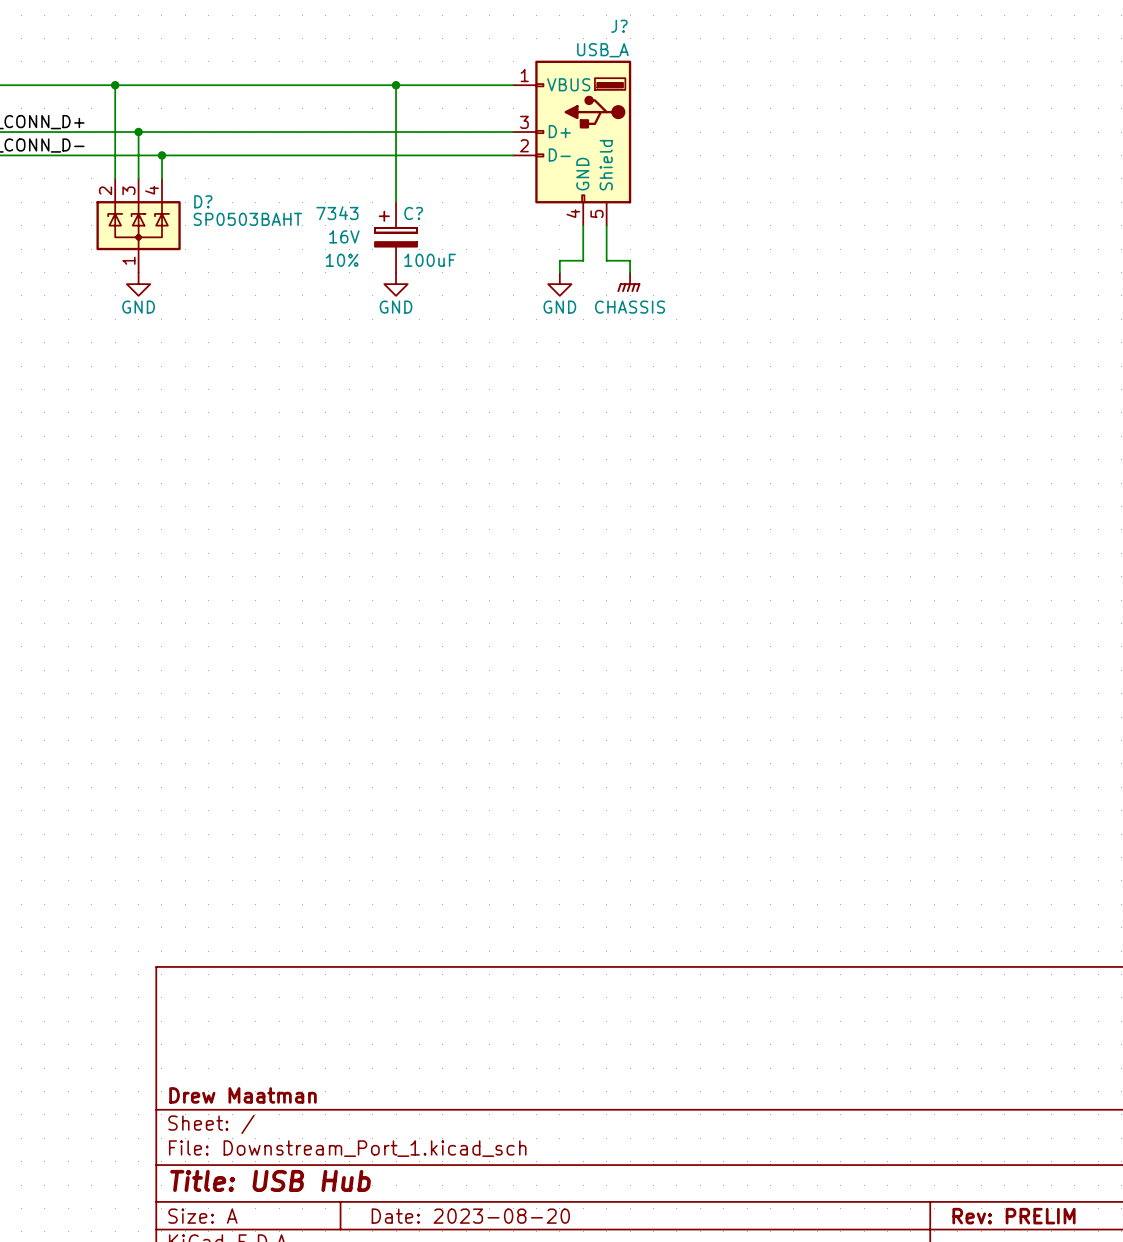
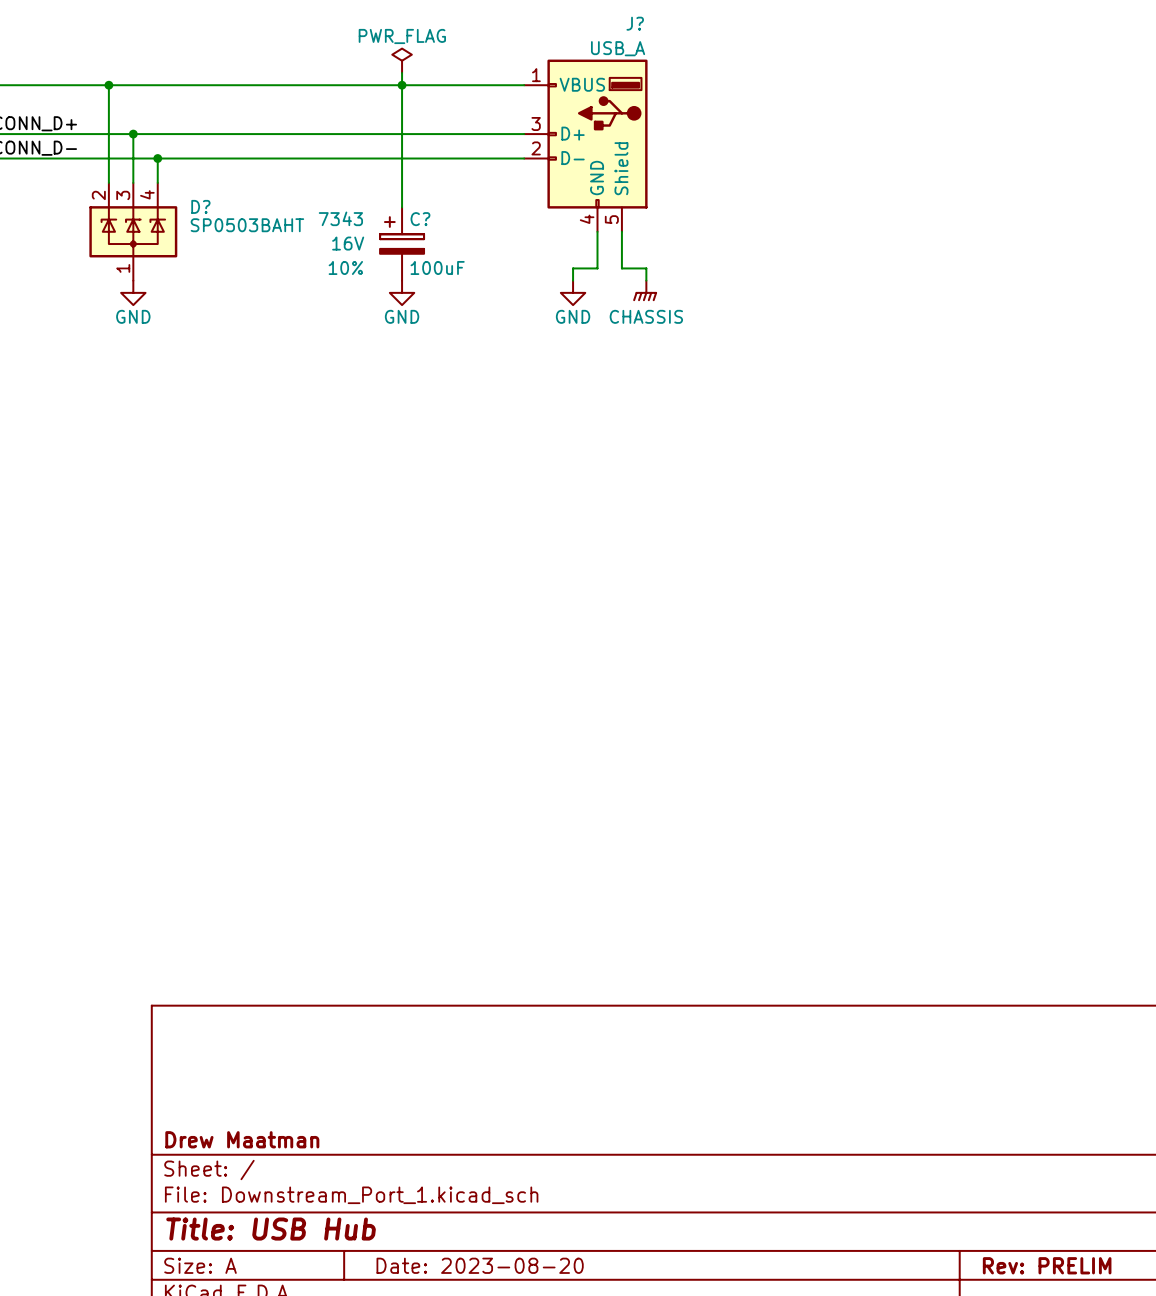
power symbol: none -> PWR_FLAG (402, 60)
wire: none -> (402, 73) (402, 85)

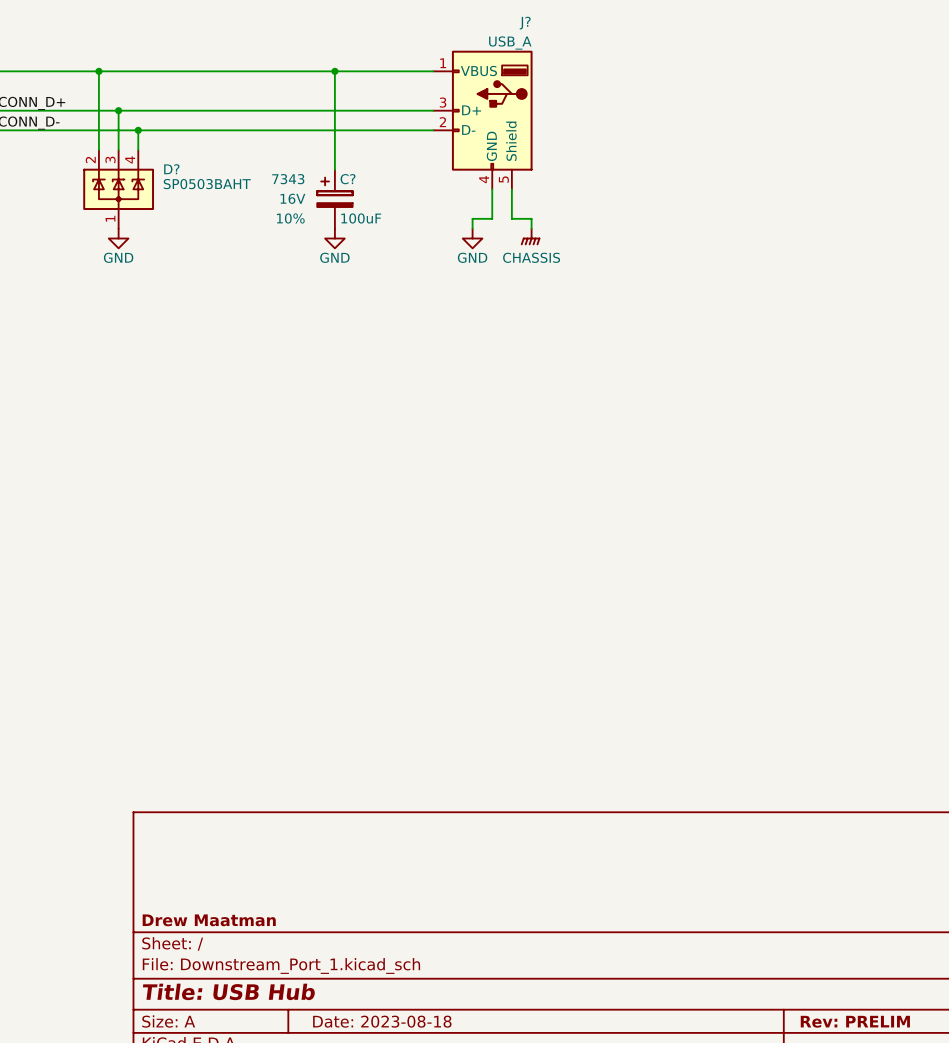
power symbol: PWR_FLAG (402, 60) -> none
wire: (402, 73) (402, 85) -> none
title block: Date: 2023-08-20 (480, 1265) -> Date: 2023-08-18 (382, 1021)

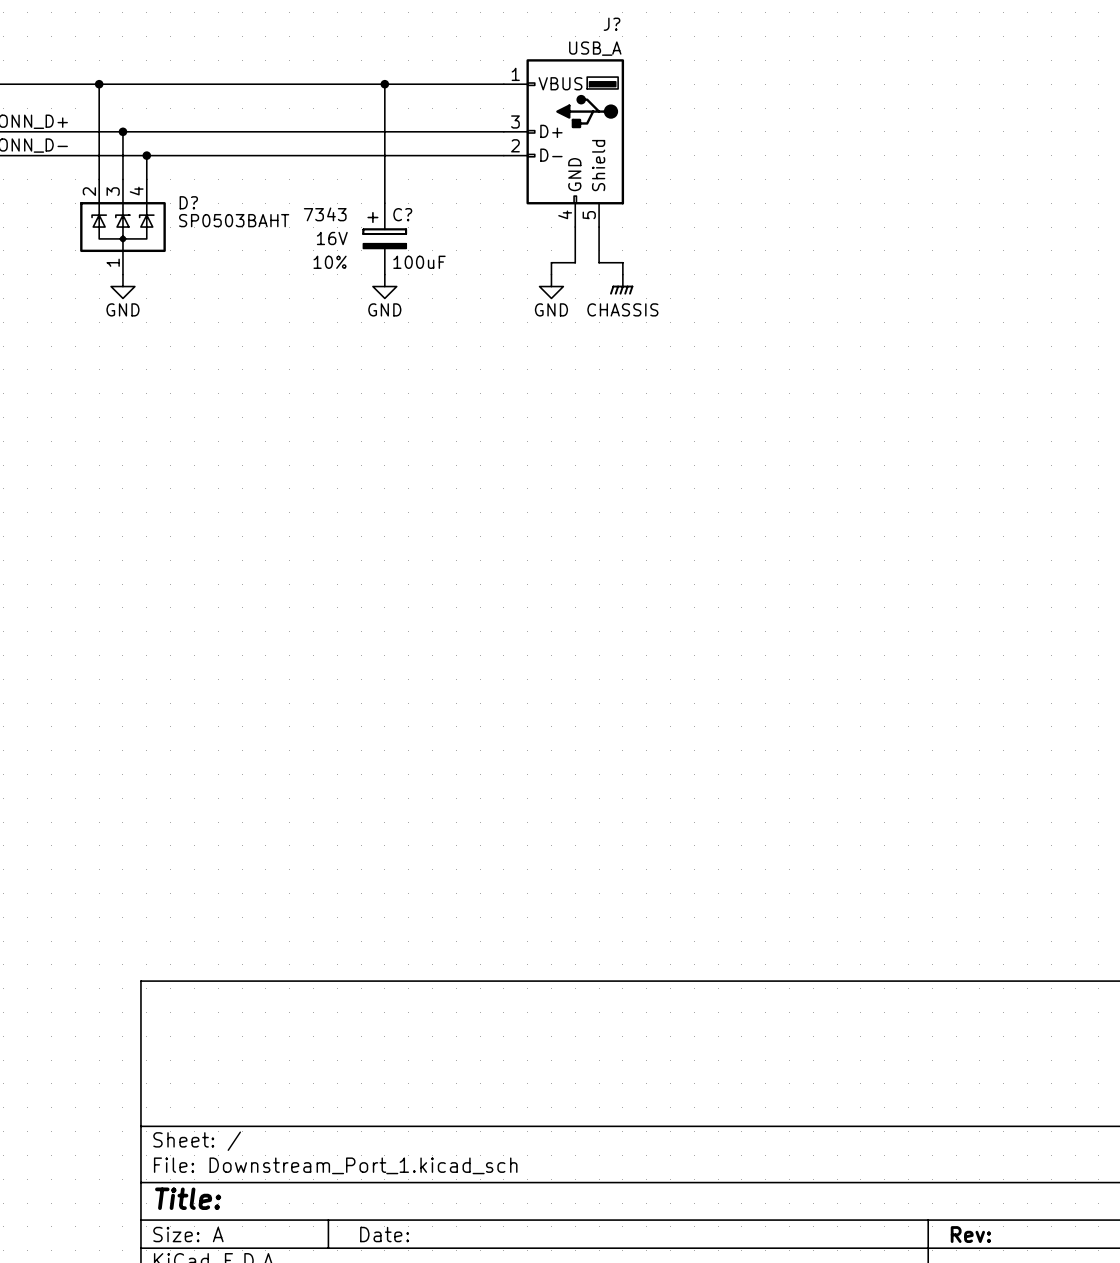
title block: Drew Maatman (209, 920) -> none
title block: Title: USB Hub (228, 991) -> Title: (188, 1198)
title block: Date: 2023-08-18 (382, 1021) -> Date: (384, 1234)
title block: Rev: PRELIM (855, 1021) -> Rev: (970, 1234)

